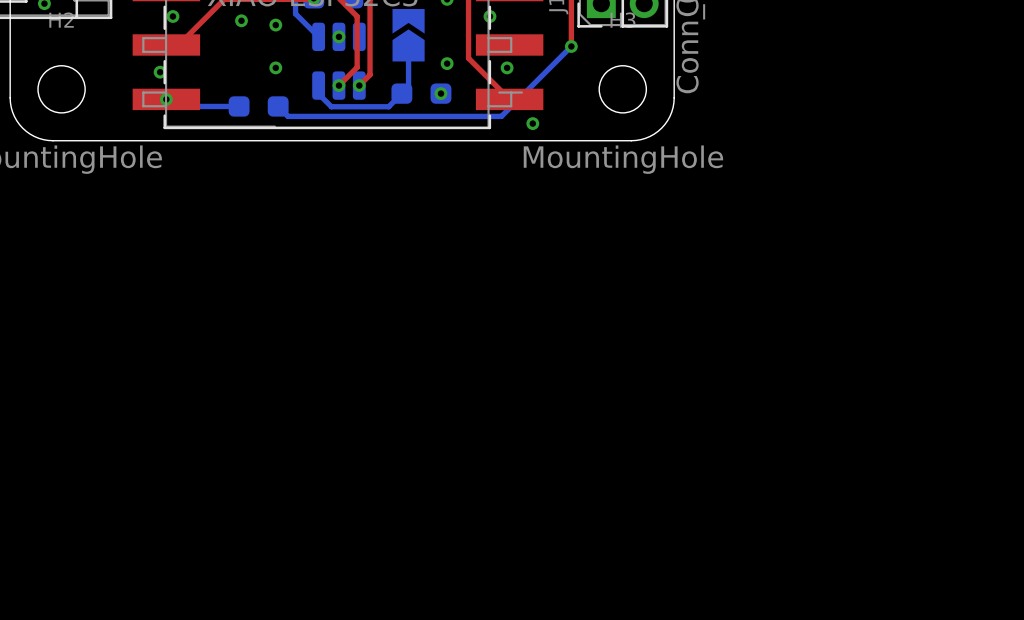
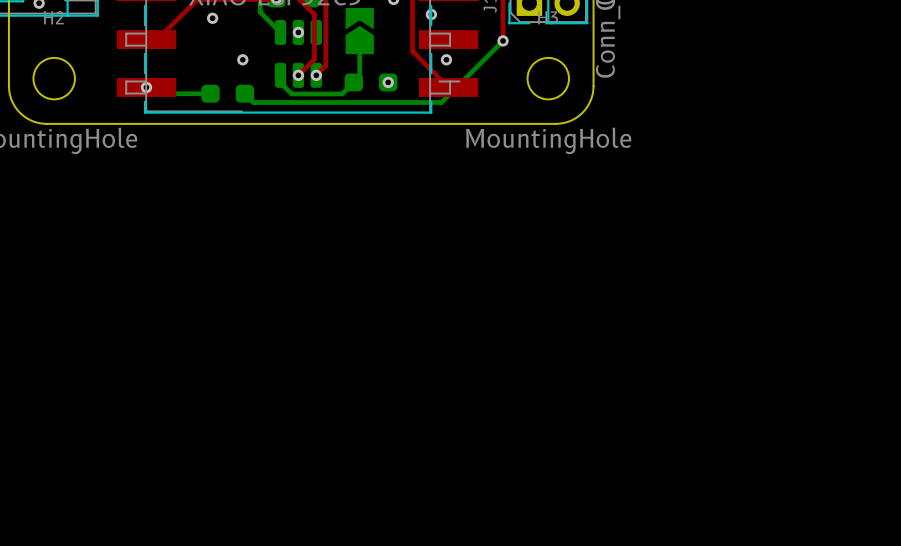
via: (172, 16) -> none
via: (275, 25) -> none
via: (447, 63) -> none
via: (160, 72) -> none
via: (532, 123) -> none

